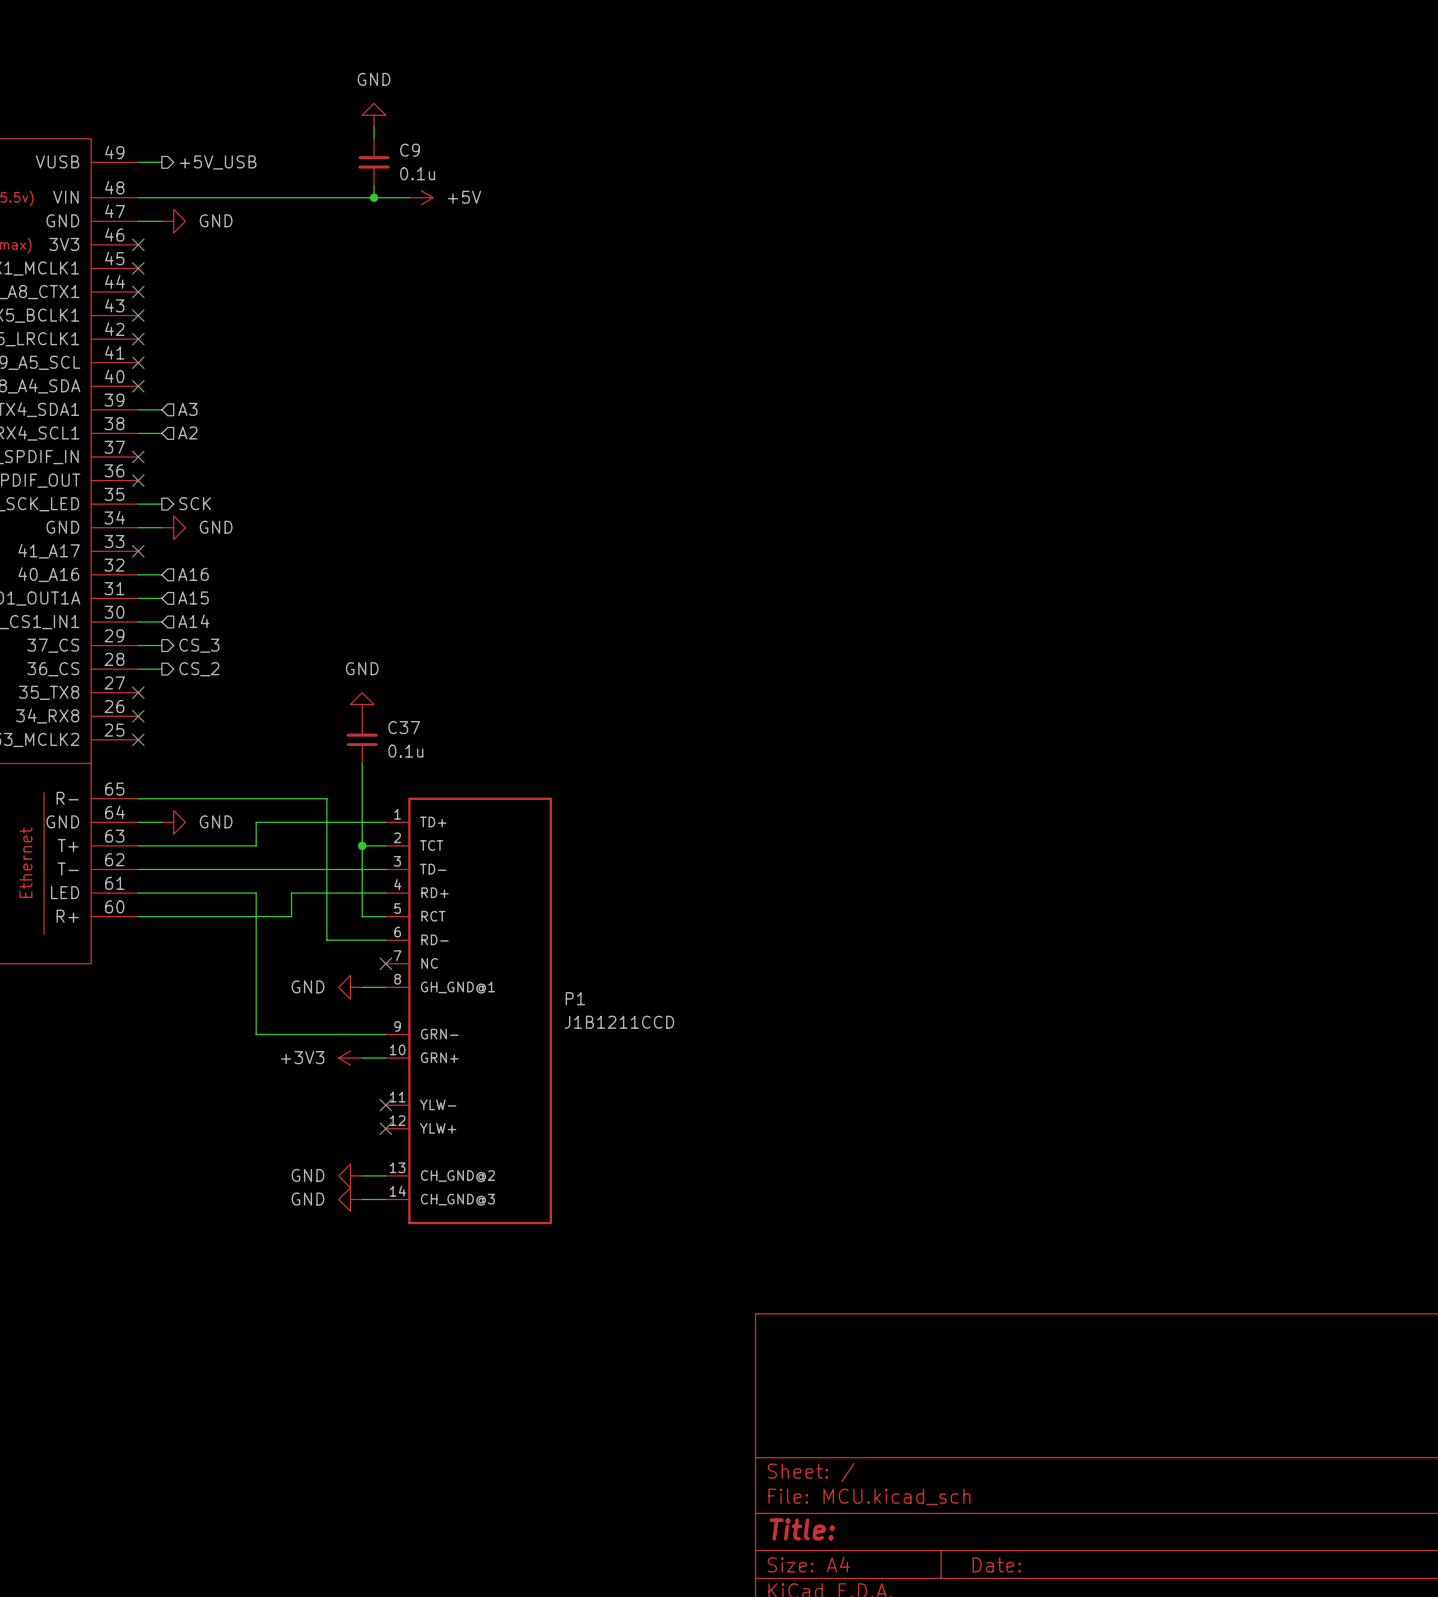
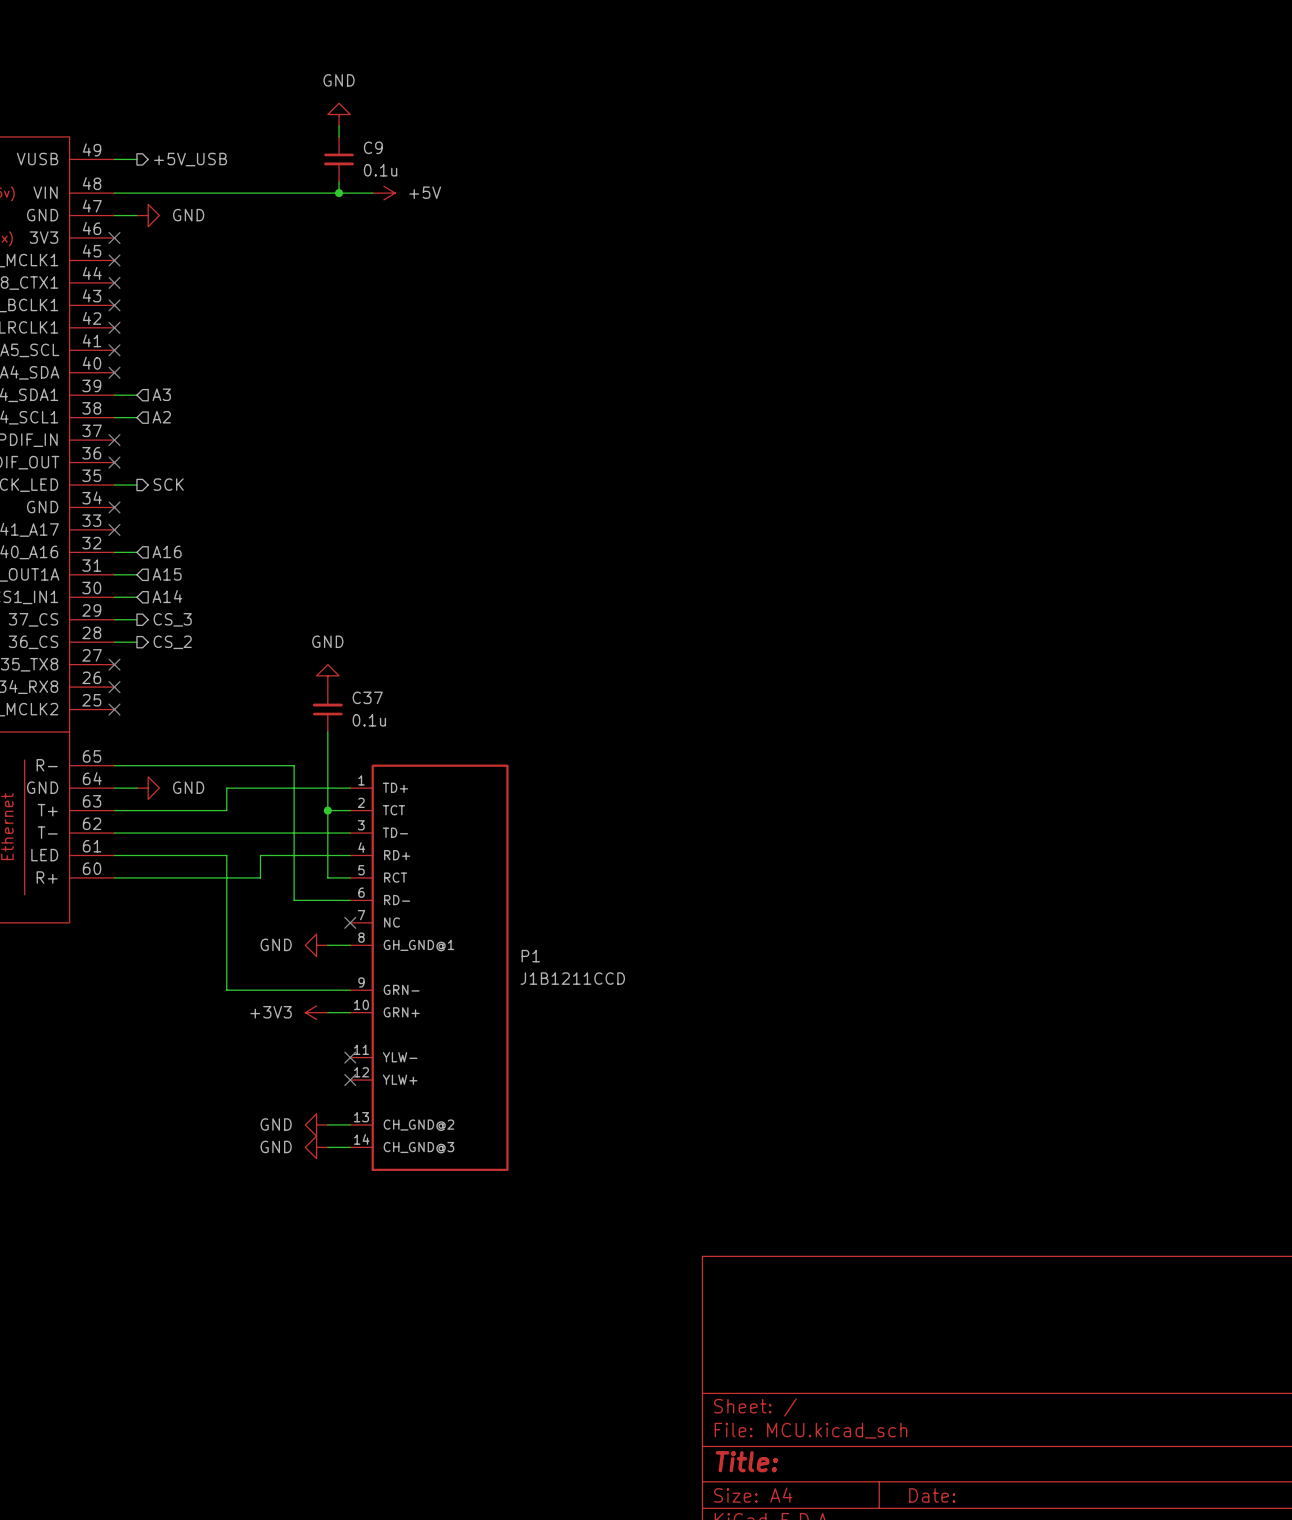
wire: (138, 527) (161, 527) -> none
no-connect mark: none -> (114, 507)
power symbol: GND (173, 527) -> none

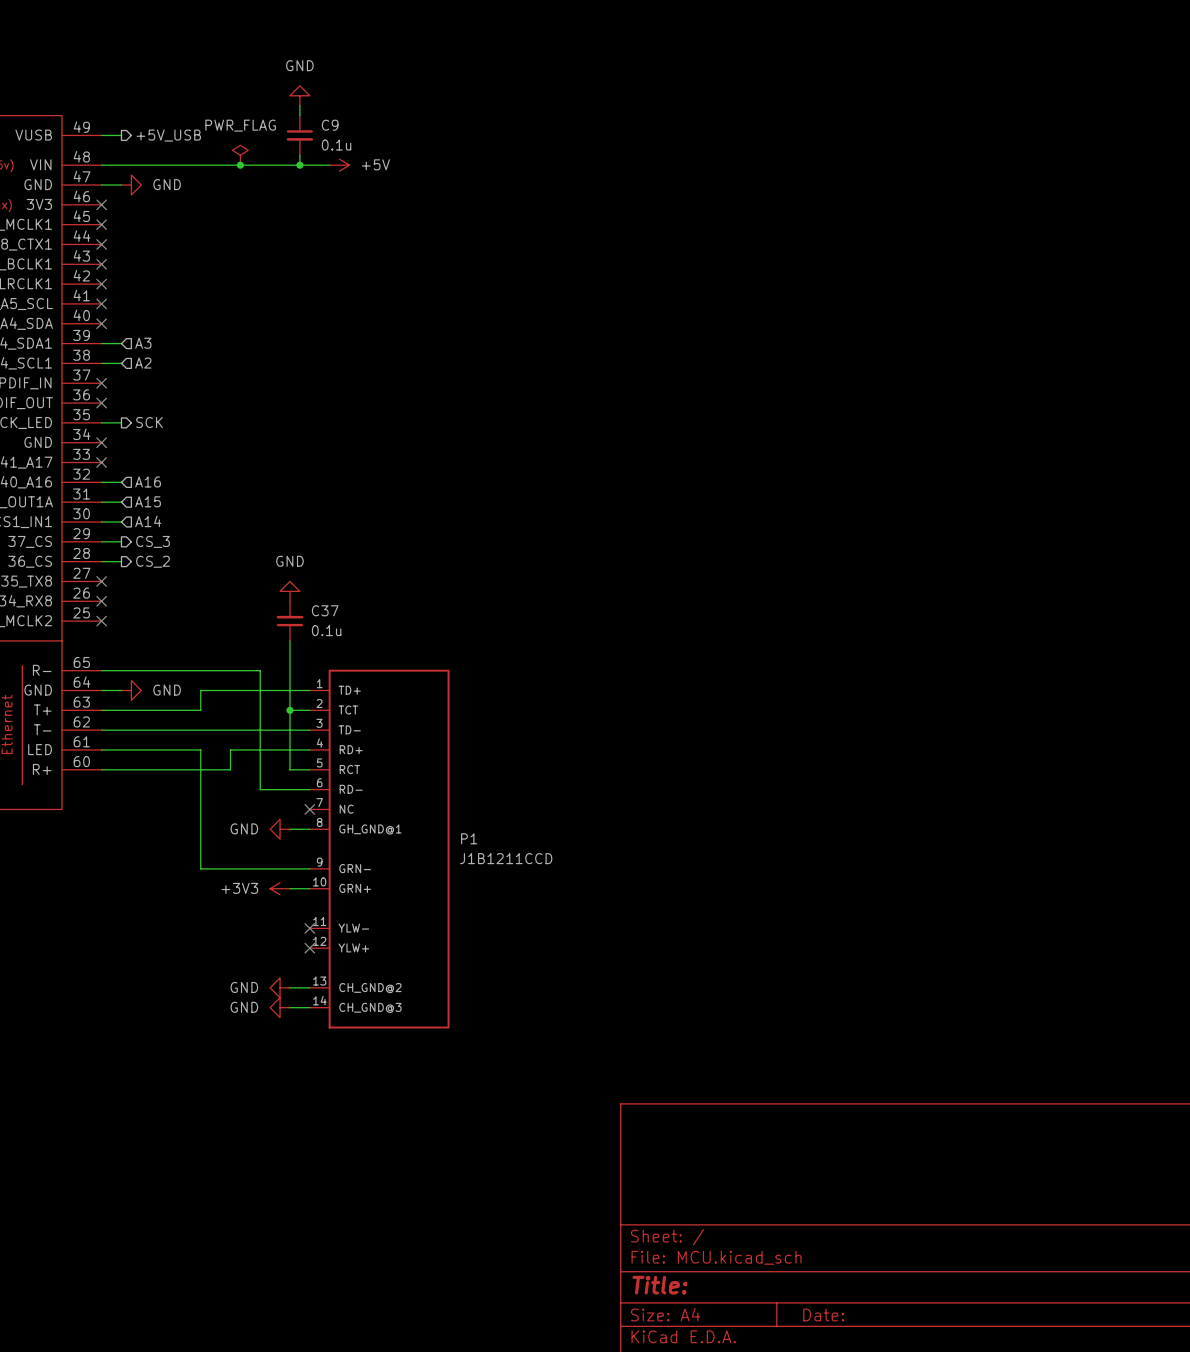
power symbol: none -> PWR_FLAG (240, 155)
junction: none -> (240, 165)

